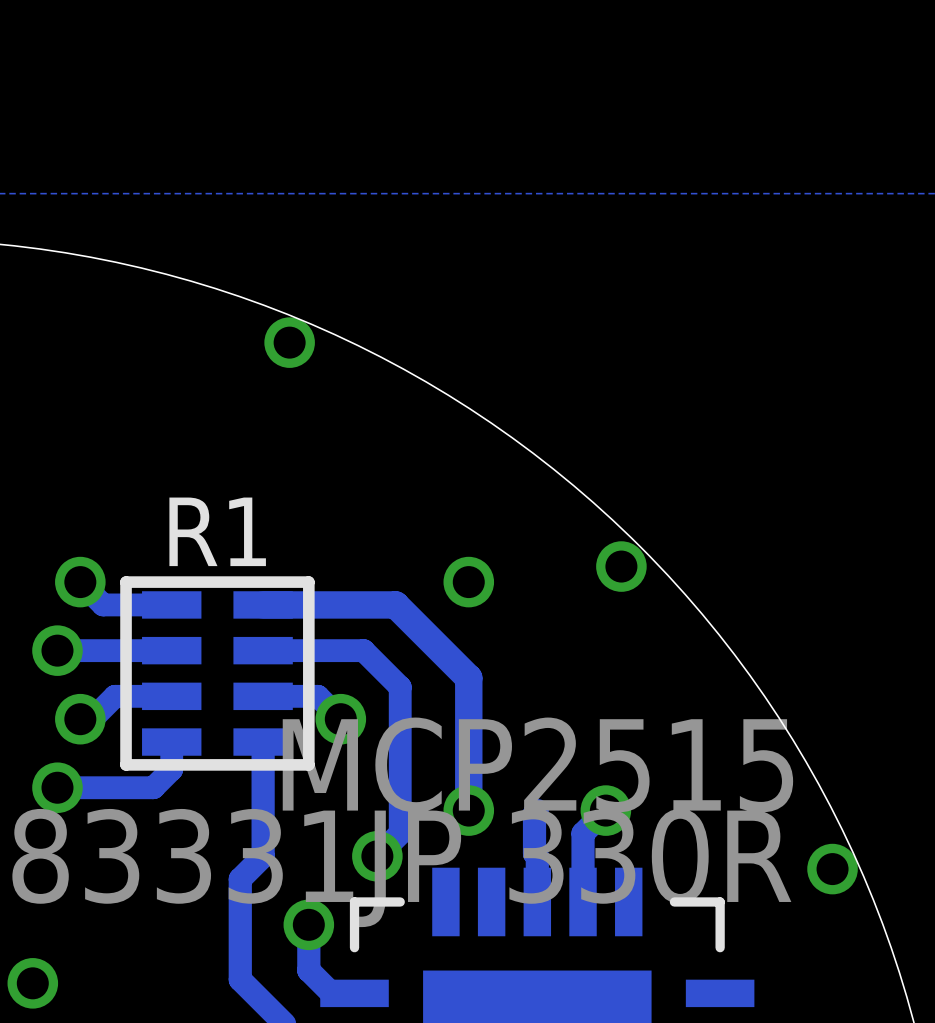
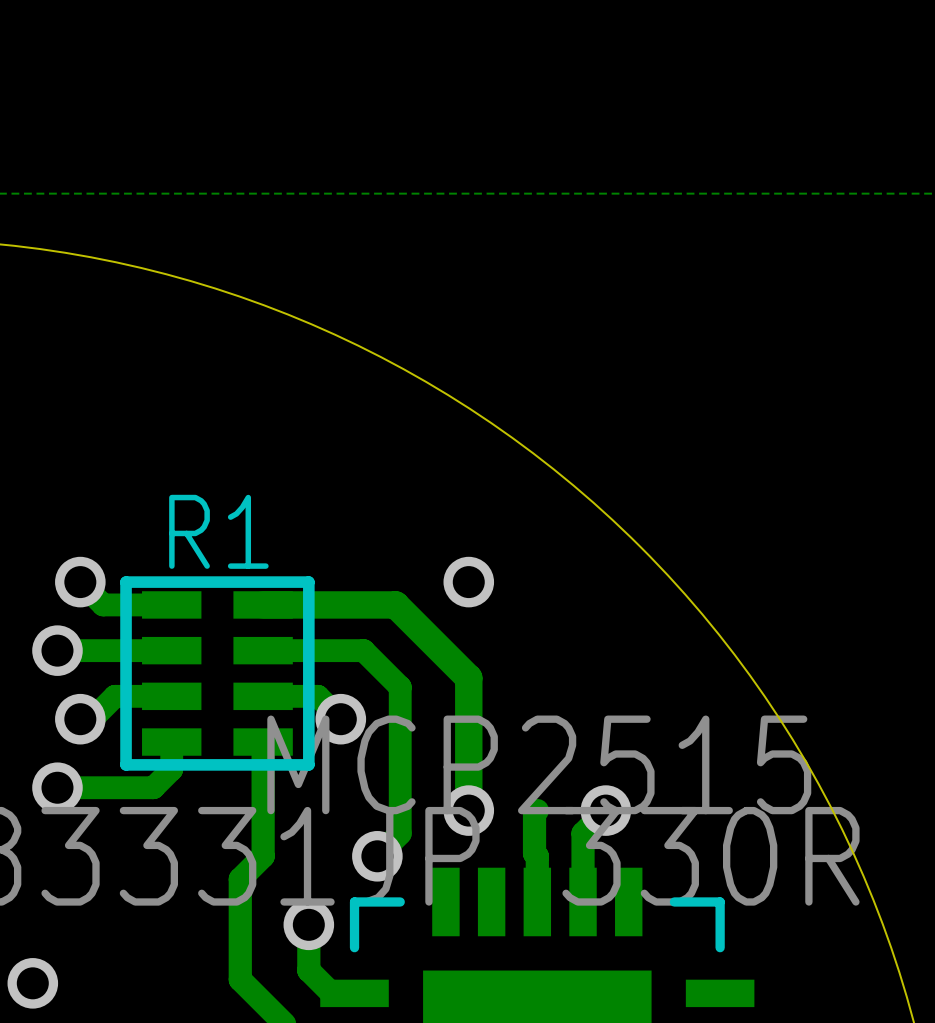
via: (289, 342) -> none
via: (621, 566) -> none
via: (832, 869) -> none

